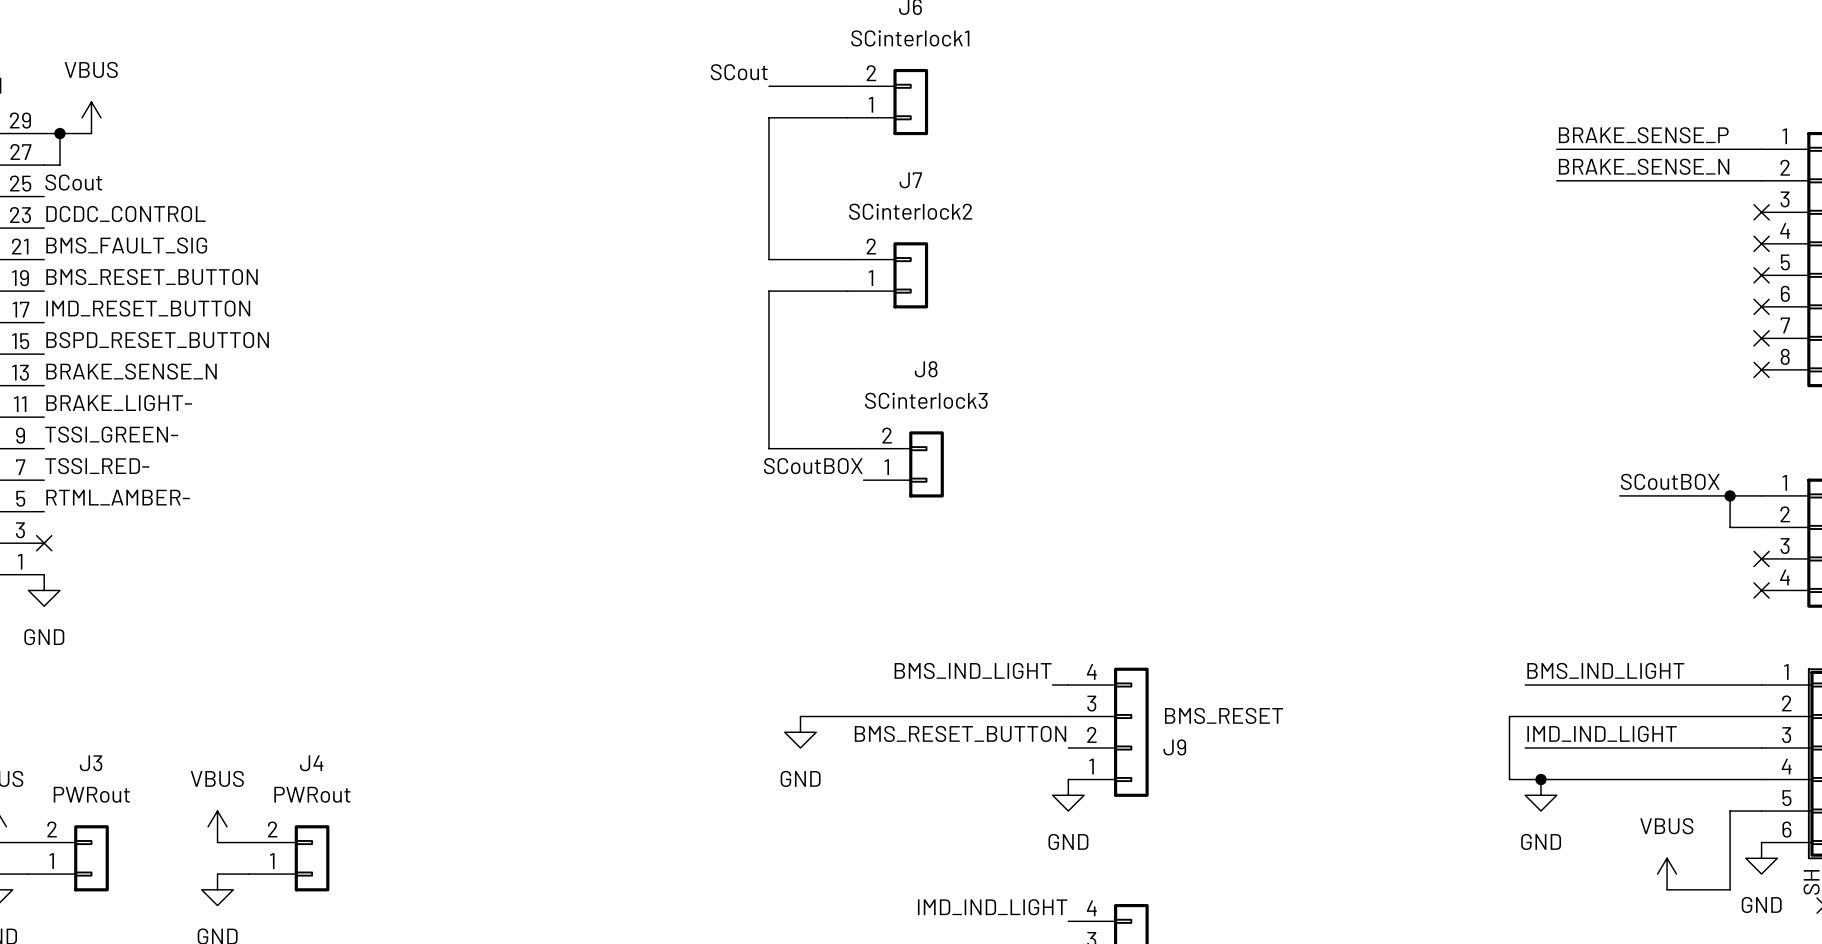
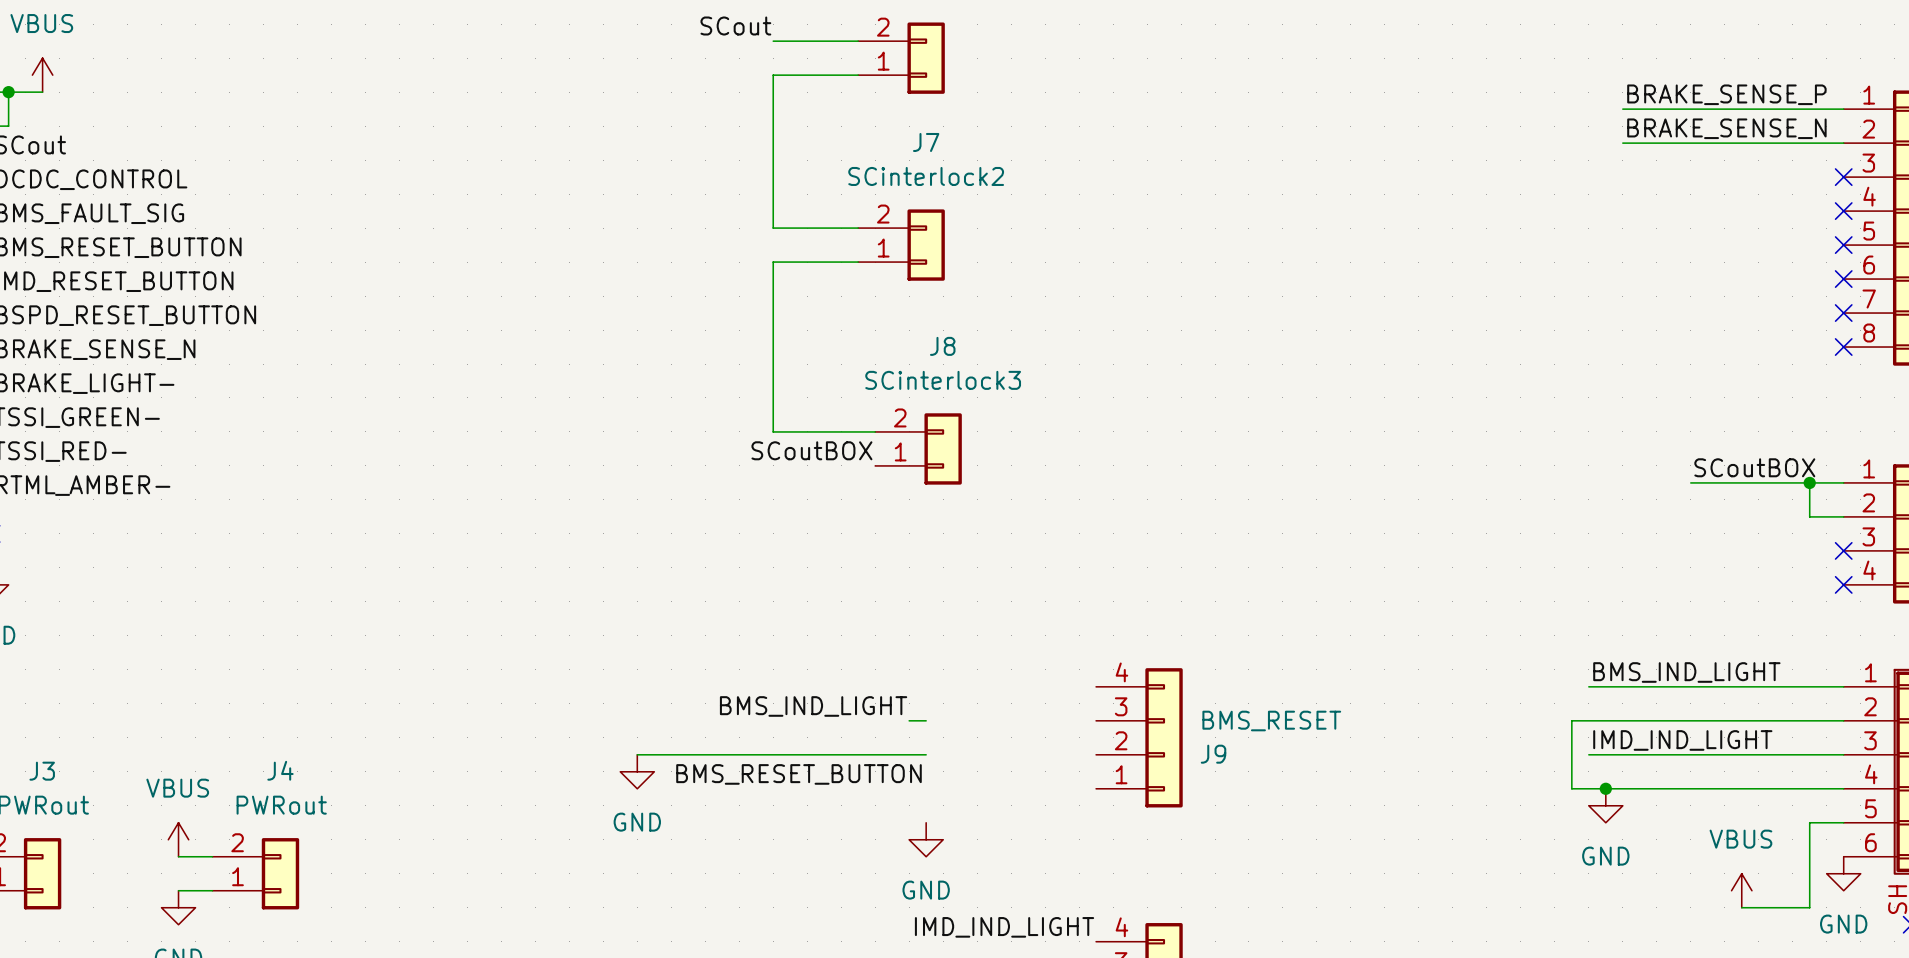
label position: BMS_IND_LIGHT (973, 670) -> BMS_IND_LIGHT (813, 706)
wire: (1052, 684) (1068, 684) -> none
wire: (800, 716) (895, 716) -> none
wire: (910, 716) (1068, 716) -> none
power symbol: GND (800, 732) -> none
label position: BMS_RESET_BUTTON (960, 733) -> BMS_RESET_BUTTON (798, 774)
wire: none -> (637, 754) (926, 754)
power symbol: none -> GND (637, 771)
power symbol: GND (1068, 795) -> none
power symbol: none -> GND (926, 839)

